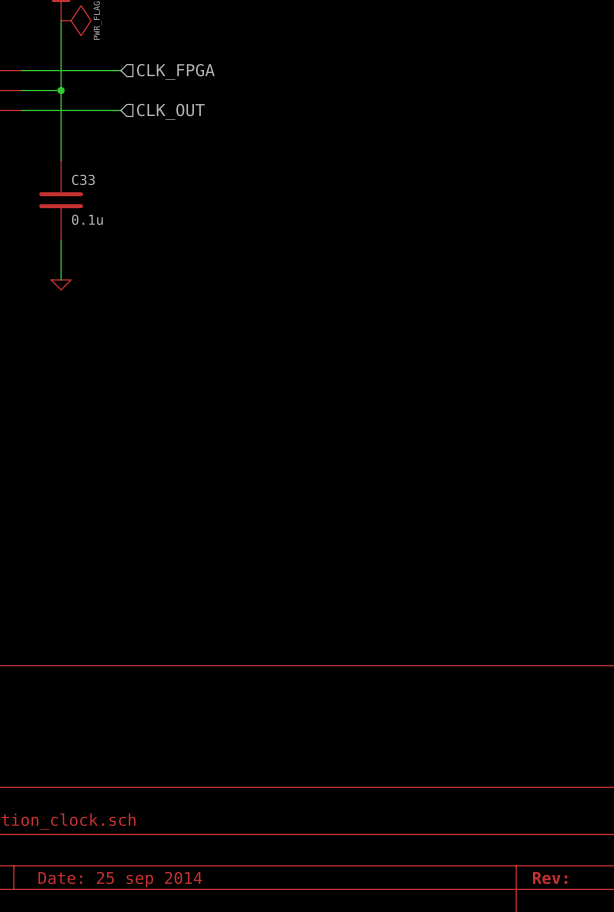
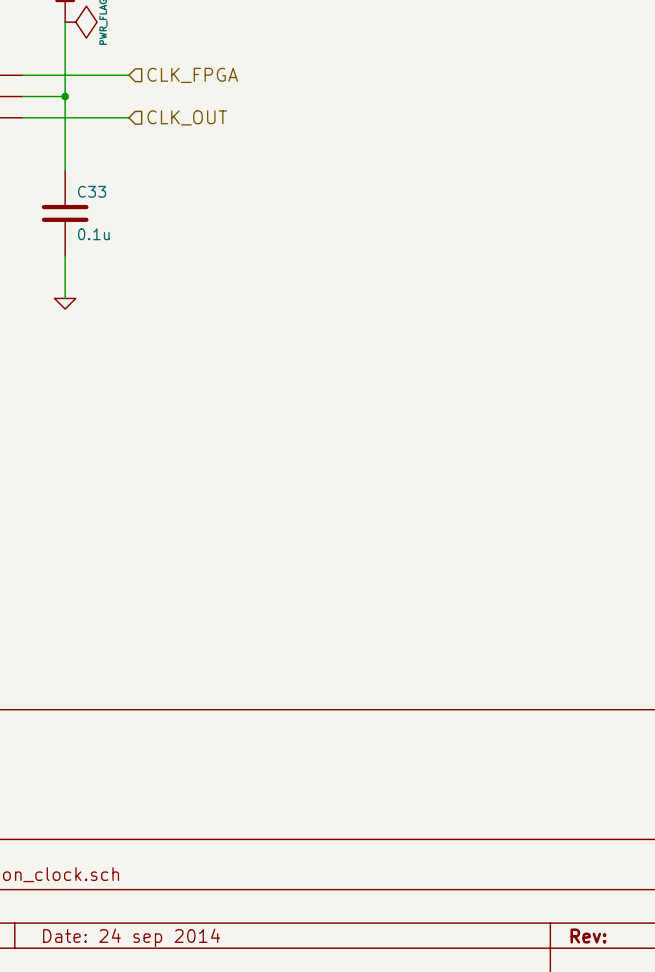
title block: Date: 25 sep 2014 (120, 879) -> Date: 24 sep 2014 (131, 937)

